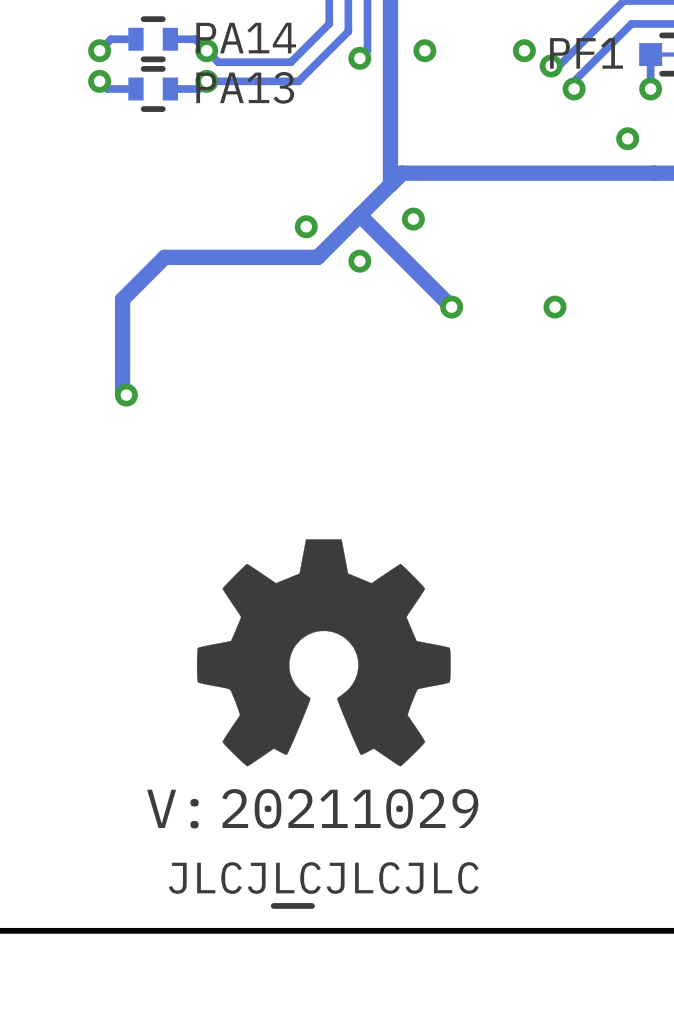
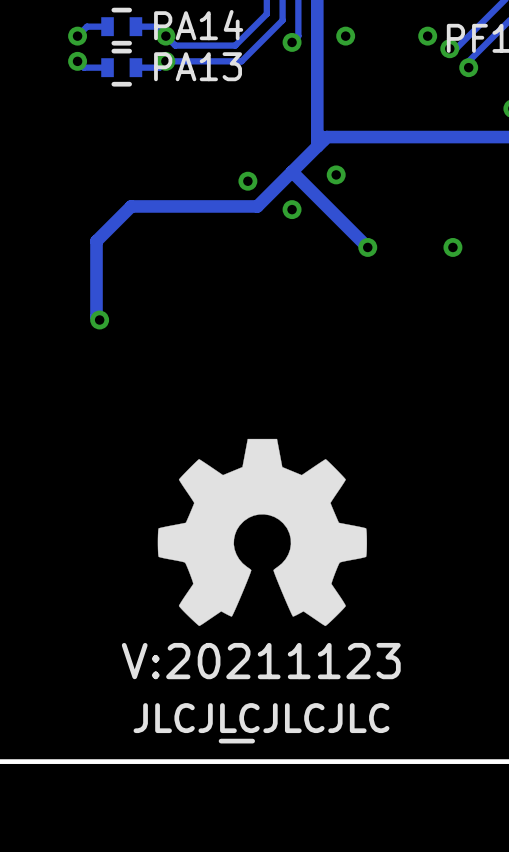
drawing shape: [147, 789, 479, 829] -> [121, 642, 401, 680]

